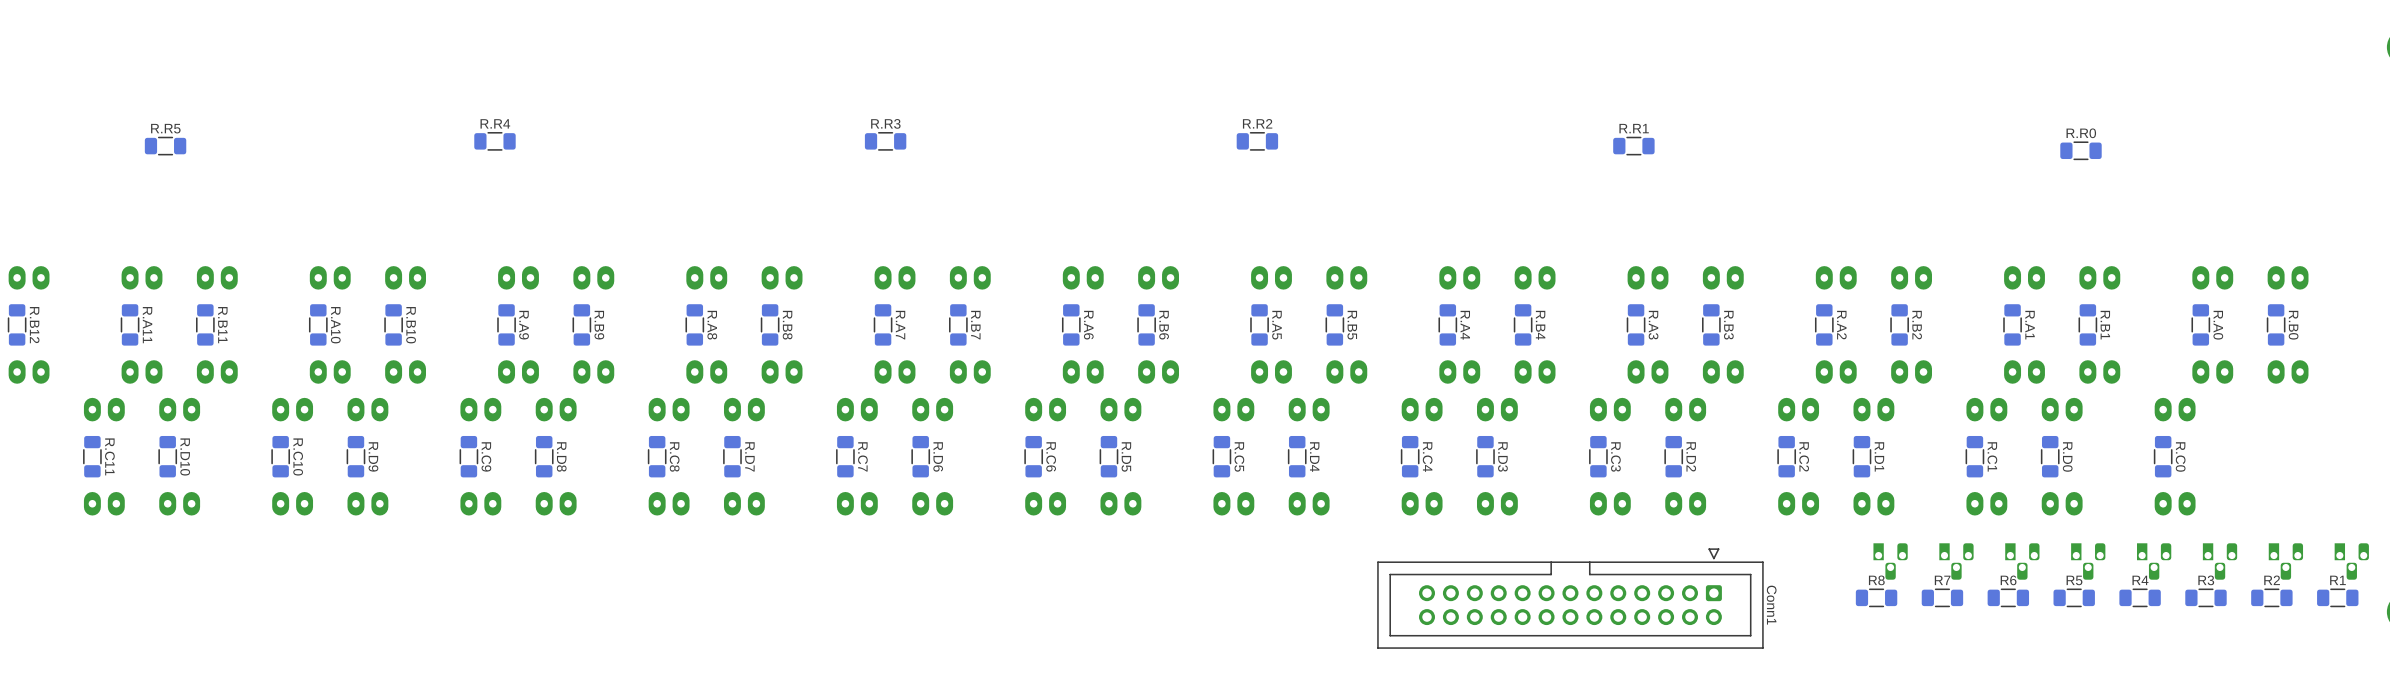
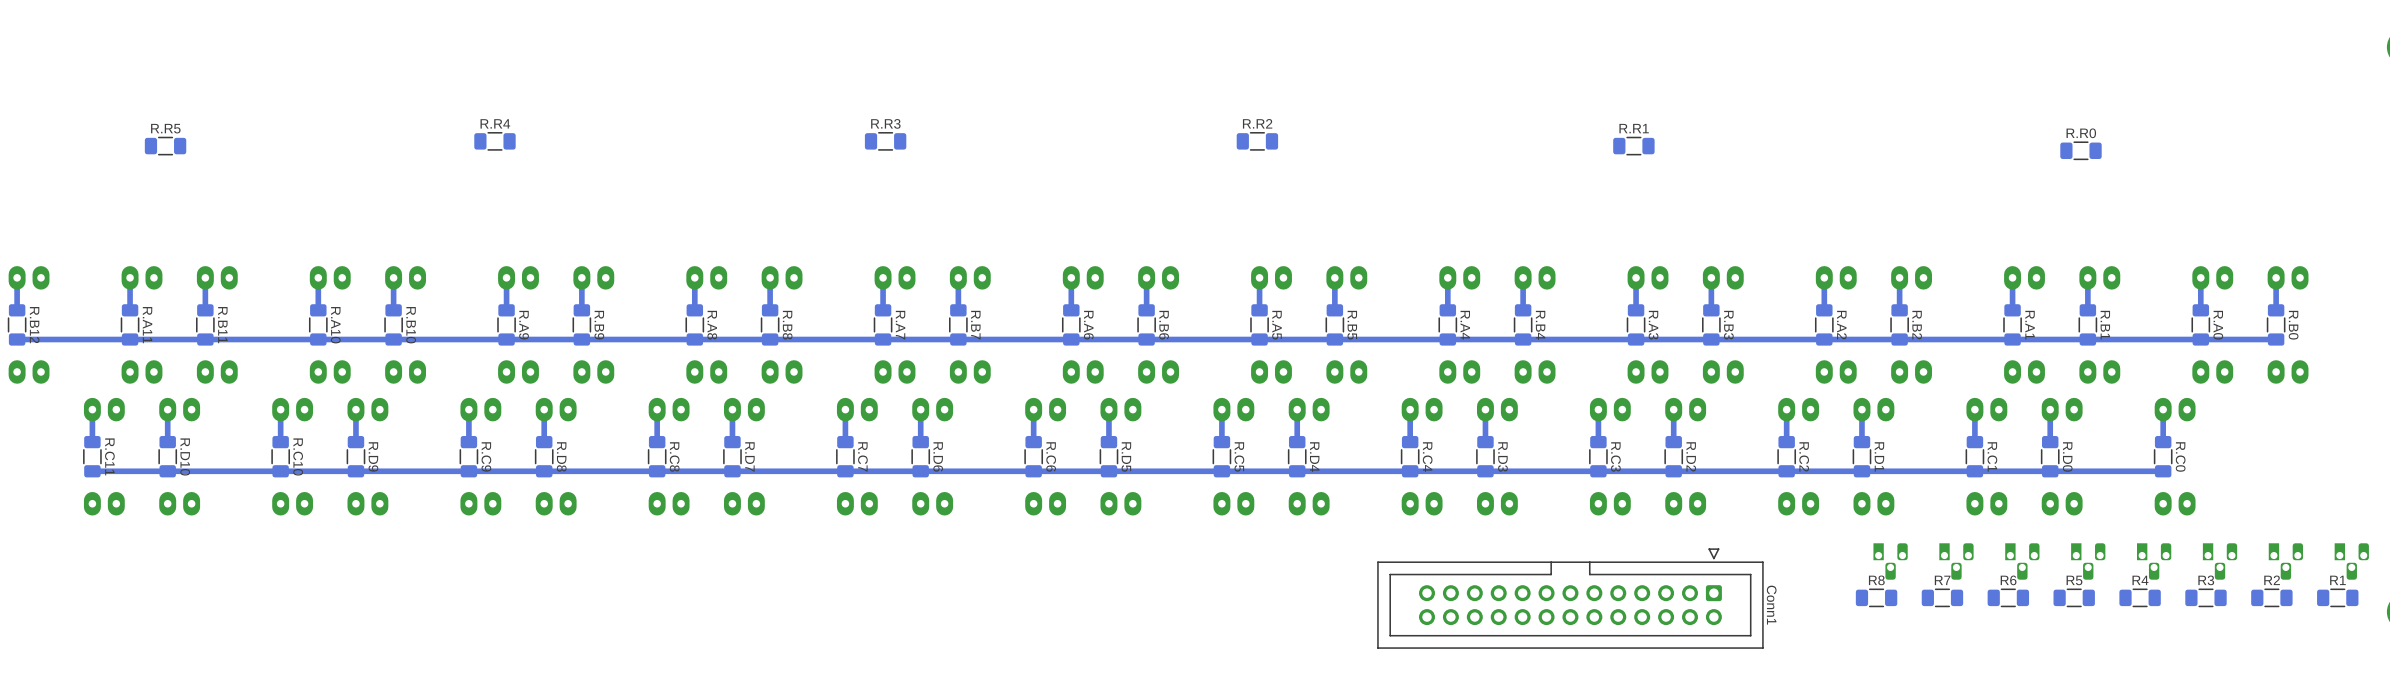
track: none -> (17, 277) (17, 310)
track: none -> (130, 277) (130, 310)
track: none -> (205, 277) (205, 310)
track: none -> (318, 277) (318, 310)
track: none -> (393, 277) (393, 310)
track: none -> (506, 277) (506, 310)
track: none -> (581, 277) (581, 310)
track: none -> (694, 277) (694, 310)
track: none -> (770, 277) (770, 310)
track: none -> (883, 277) (883, 310)
track: none -> (958, 277) (958, 310)
track: none -> (1071, 277) (1071, 310)
track: none -> (1146, 277) (1146, 310)
track: none -> (1259, 277) (1259, 310)
track: none -> (1334, 277) (1334, 310)
track: none -> (1447, 277) (1447, 310)
track: none -> (1523, 277) (1523, 310)
track: none -> (1636, 277) (1636, 310)
track: none -> (1711, 277) (1711, 310)
track: none -> (1824, 277) (1824, 310)
track: none -> (1899, 277) (1899, 310)
track: none -> (2012, 277) (2012, 310)
track: none -> (2087, 277) (2087, 310)
track: none -> (2200, 277) (2200, 310)
track: none -> (2276, 277) (2276, 310)
track: none -> (2276, 339) (17, 339)
track: none -> (92, 409) (92, 442)
track: none -> (167, 409) (167, 442)
track: none -> (280, 409) (280, 442)
track: none -> (355, 409) (355, 442)
track: none -> (468, 409) (468, 442)
track: none -> (544, 409) (544, 442)
track: none -> (657, 409) (657, 442)
track: none -> (732, 409) (732, 442)
track: none -> (845, 409) (845, 442)
track: none -> (920, 409) (920, 442)
track: none -> (1033, 409) (1033, 442)
track: none -> (1108, 409) (1108, 442)
track: none -> (1221, 409) (1221, 442)
track: none -> (1297, 409) (1297, 442)
track: none -> (1410, 409) (1410, 442)
track: none -> (1485, 409) (1485, 442)
track: none -> (1598, 409) (1598, 442)
track: none -> (1673, 409) (1673, 442)
track: none -> (1786, 409) (1786, 442)
track: none -> (1861, 409) (1861, 442)
track: none -> (1974, 409) (1974, 442)
track: none -> (2050, 409) (2050, 442)
track: none -> (2163, 409) (2163, 442)
track: none -> (2163, 471) (92, 471)

